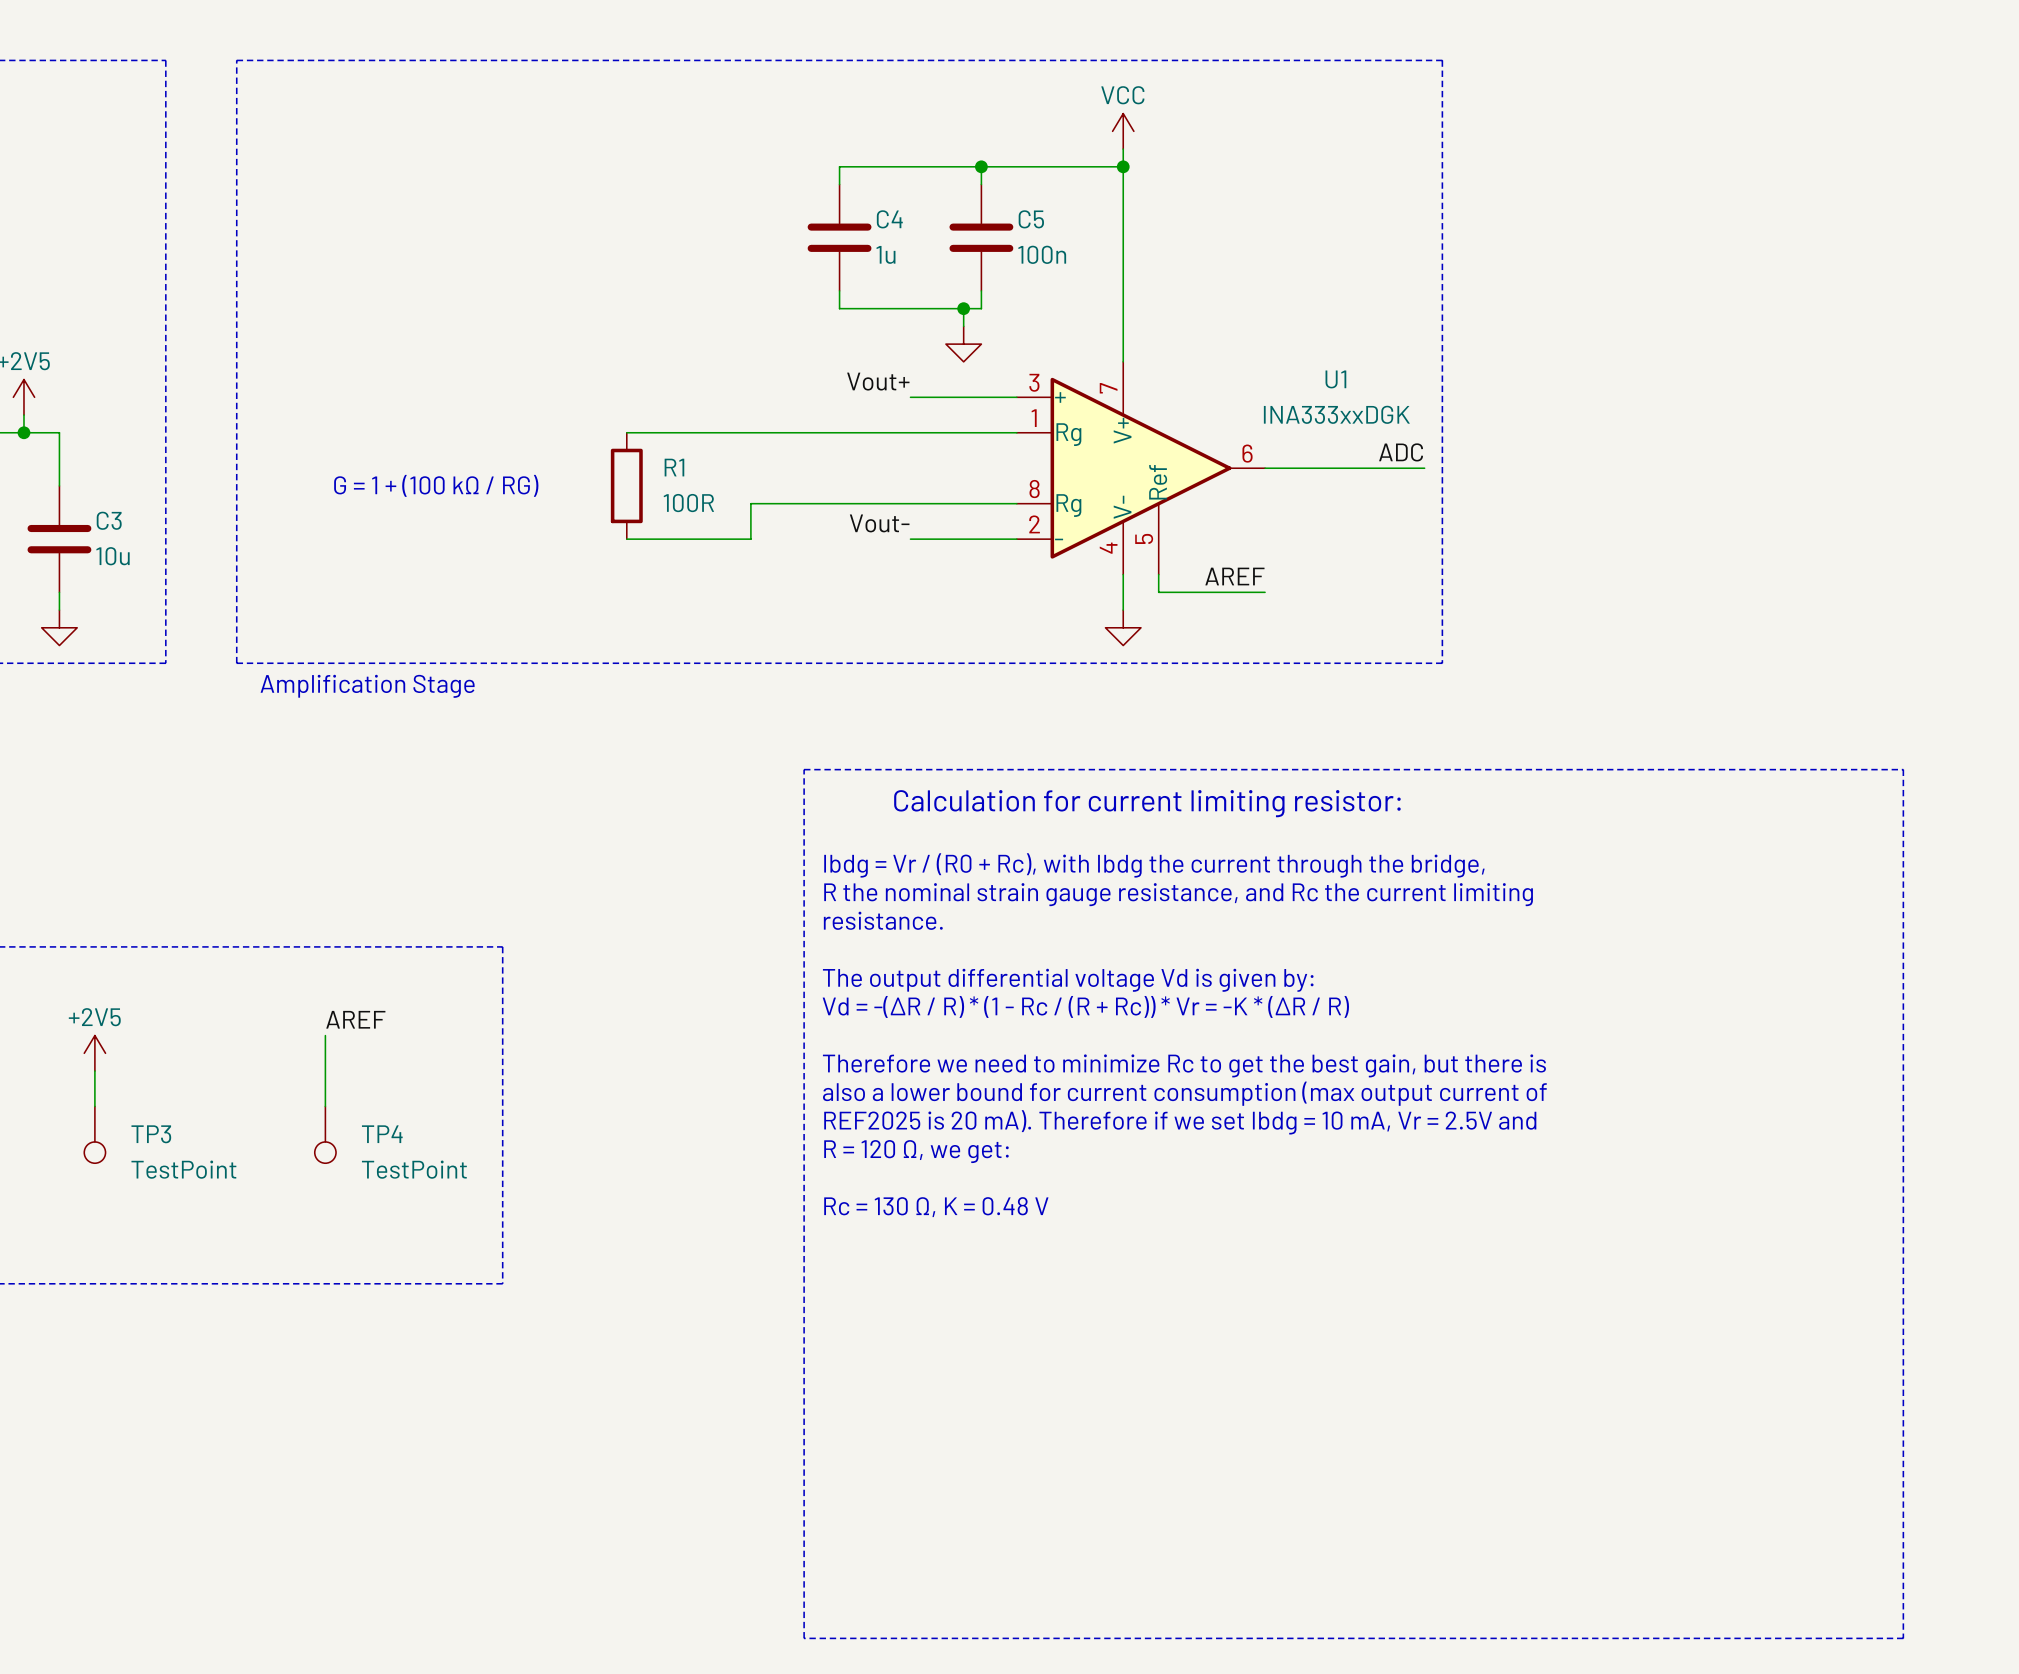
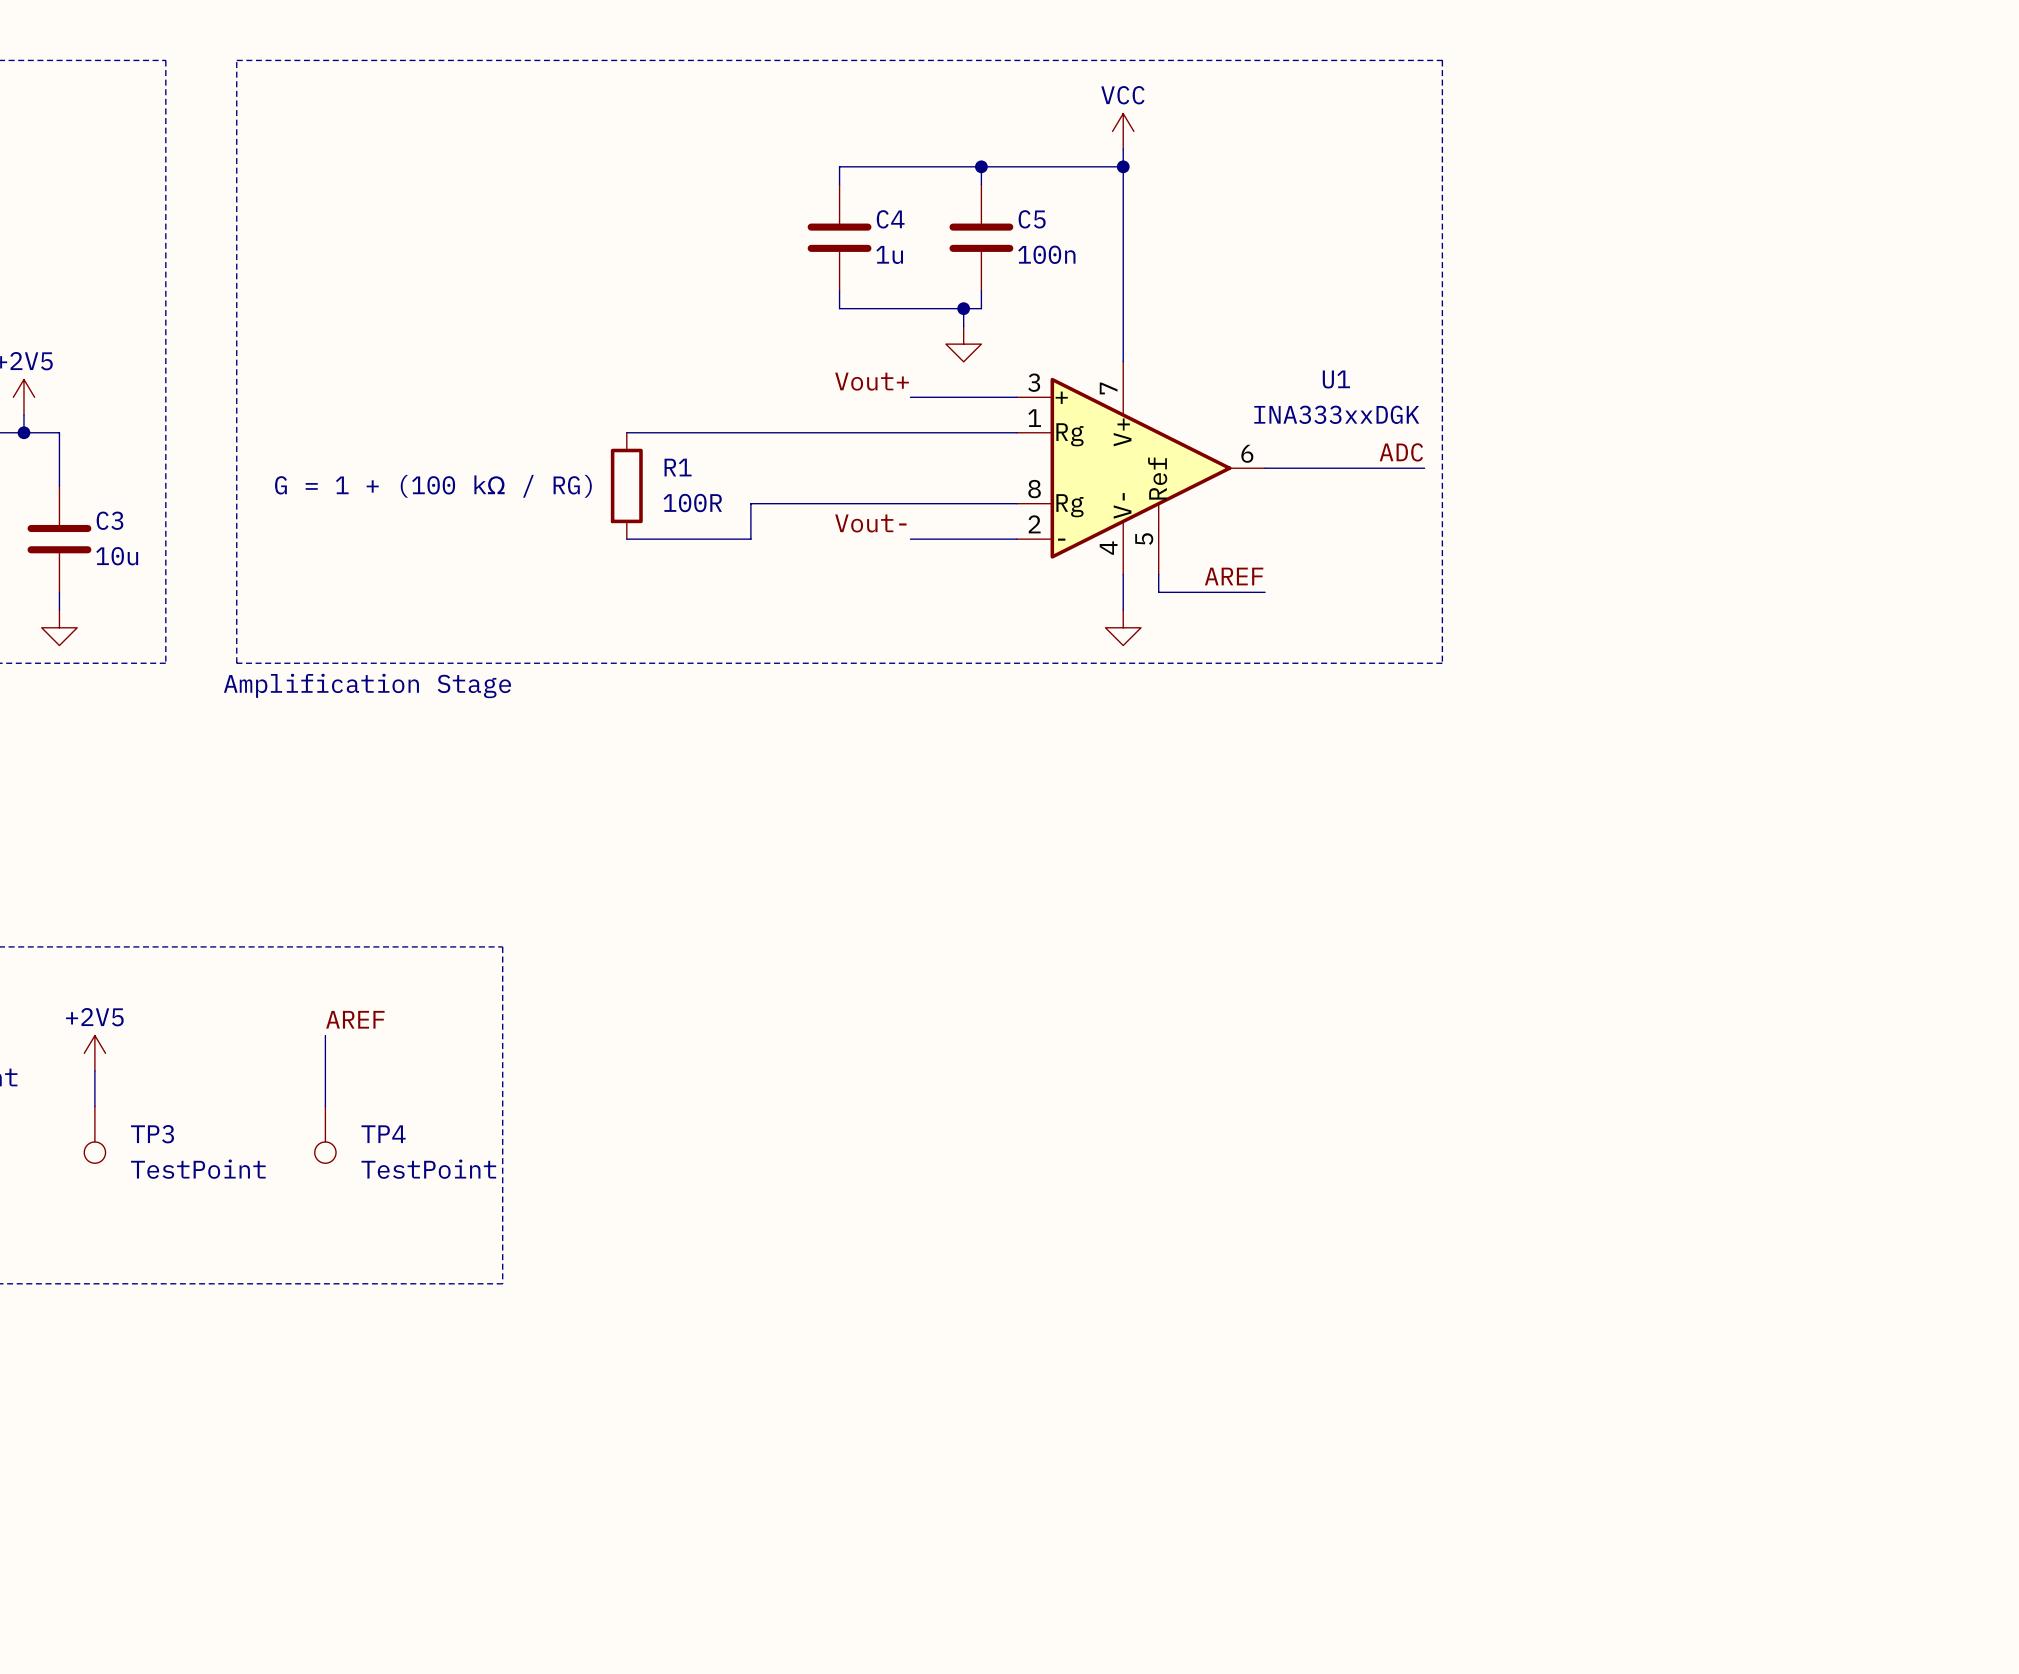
line: (804, 769) (1903, 769) (1903, 1638) (804, 1638) (804, 769) -> none
text: Calculation for current limiting resistor: (1147, 803) -> none
text: Ibdg = Vr / (R0 + Rc), with Ibdg the current through the bridge, (1154, 865) -> none
text: R the nominal strain gauge resistance, and Rc the current limiting (1178, 894) -> none
text: resistance. (883, 920) -> none
text: The output differential voltage Vd is given by: (1068, 980) -> none
text: Vd = -(ΔR / R) * (1 - Rc / (R + Rc)) * Vr = -K * (ΔR / R) (1085, 1006) -> none
text: Therefore we need to minimize Rc to get the best gain, but there is (1184, 1065) -> none
text: also a lower bound for current consumption (max output current of (1184, 1093) -> none
text: REF2025 is 20 mA). Therefore if we set Ibdg = 10 mA, Vr = 2.5V and (1180, 1122) -> none
text: R = 120 Ω, we get: (916, 1151) -> none
text: Rc = 130 Ω, K = 0.48 V (936, 1207) -> none

